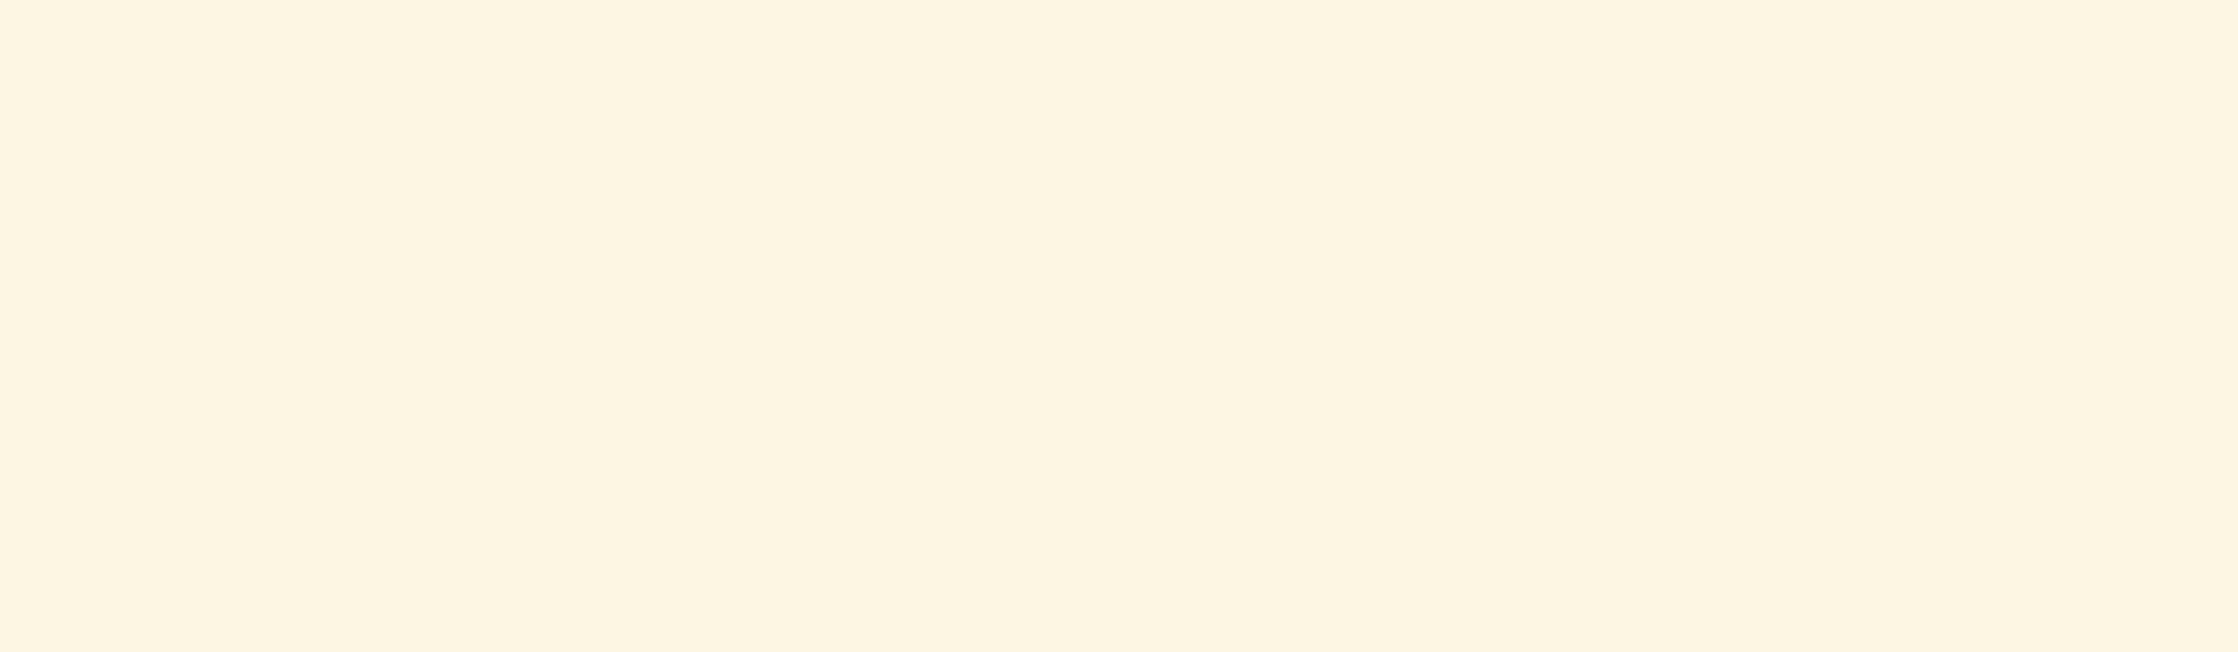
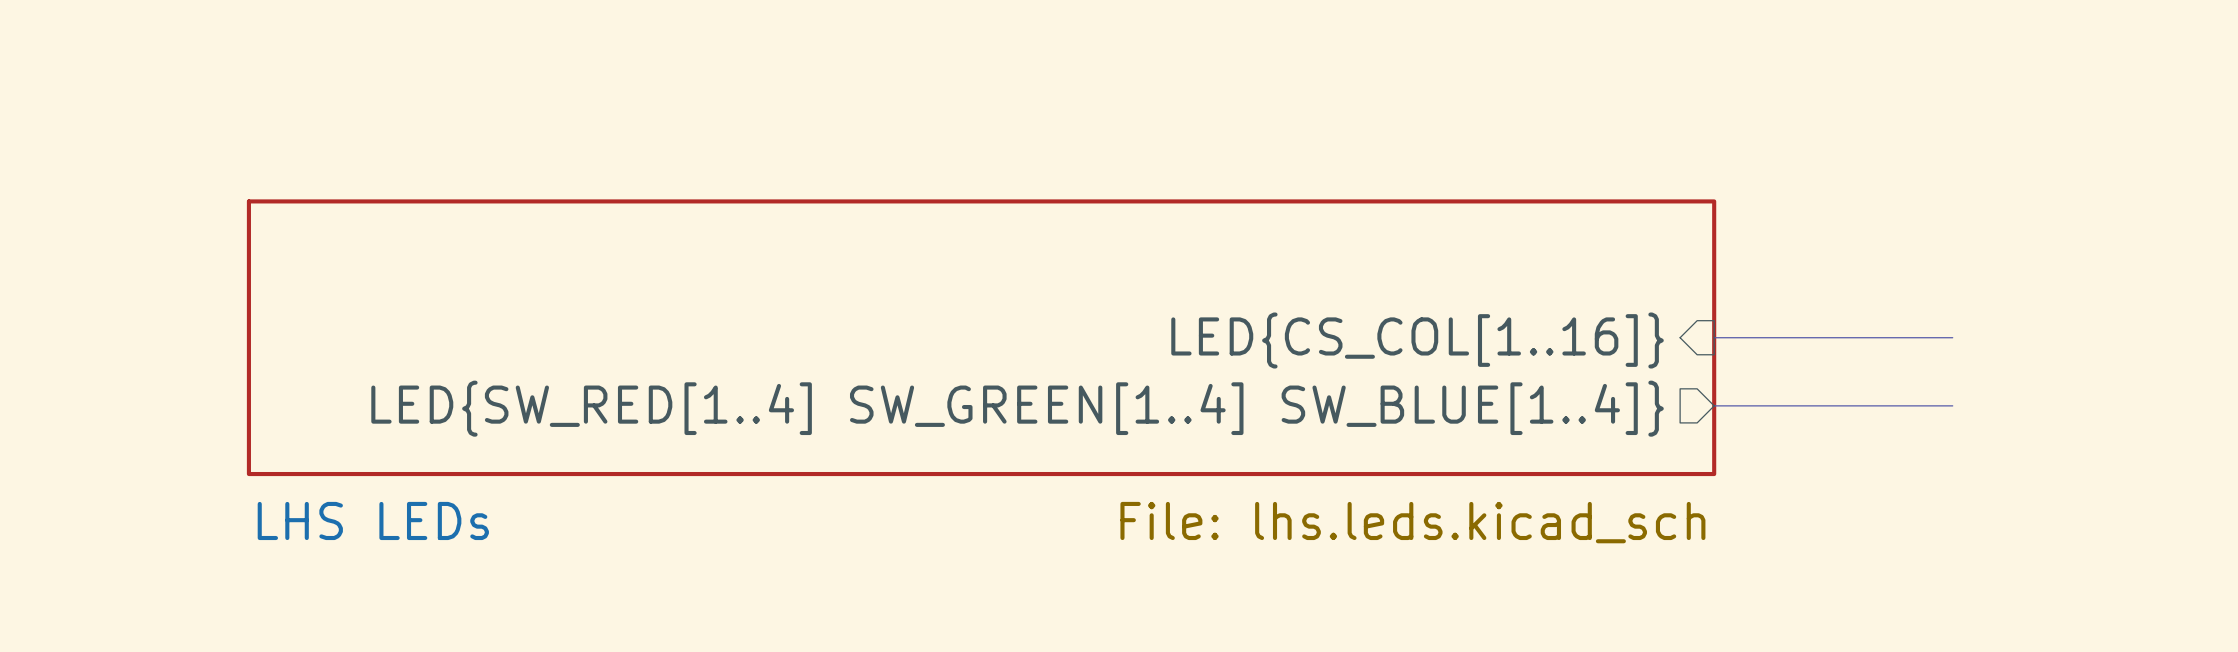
sheet LHS LEDs: none -> File: lhs.leds.kicad_sch (981, 337)
bus: none -> (1714, 337) (1952, 337)
sheet pin: none -> LED{CS_COL[1..16]} (1417, 340)
bus: none -> (1714, 405) (1952, 405)
sheet pin: none -> LED{SW_RED[1..4] SW_GREEN[1..4] SW_BLUE[1..4]} (1017, 408)

